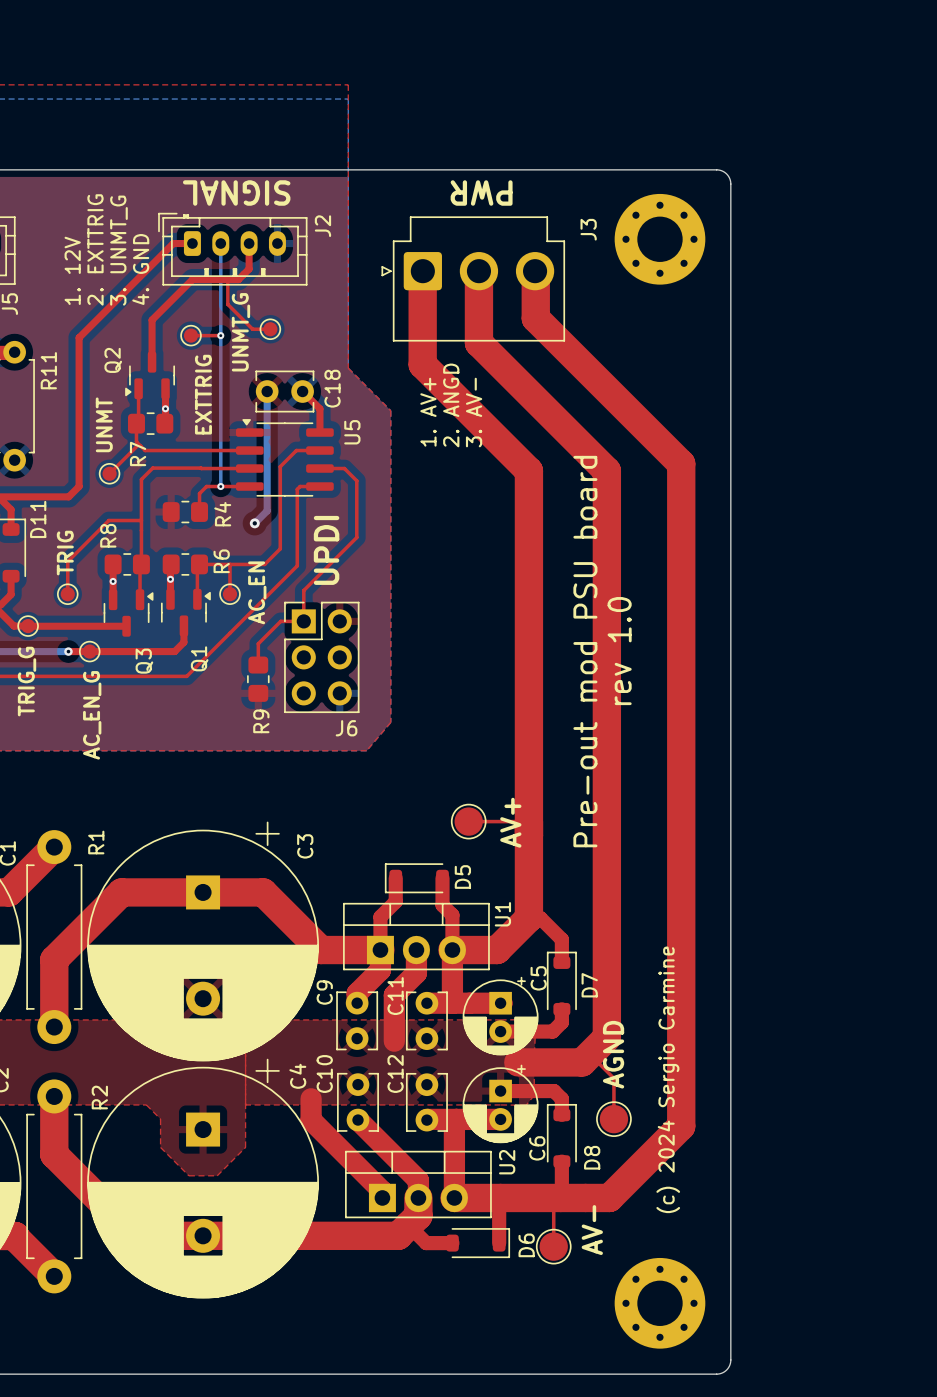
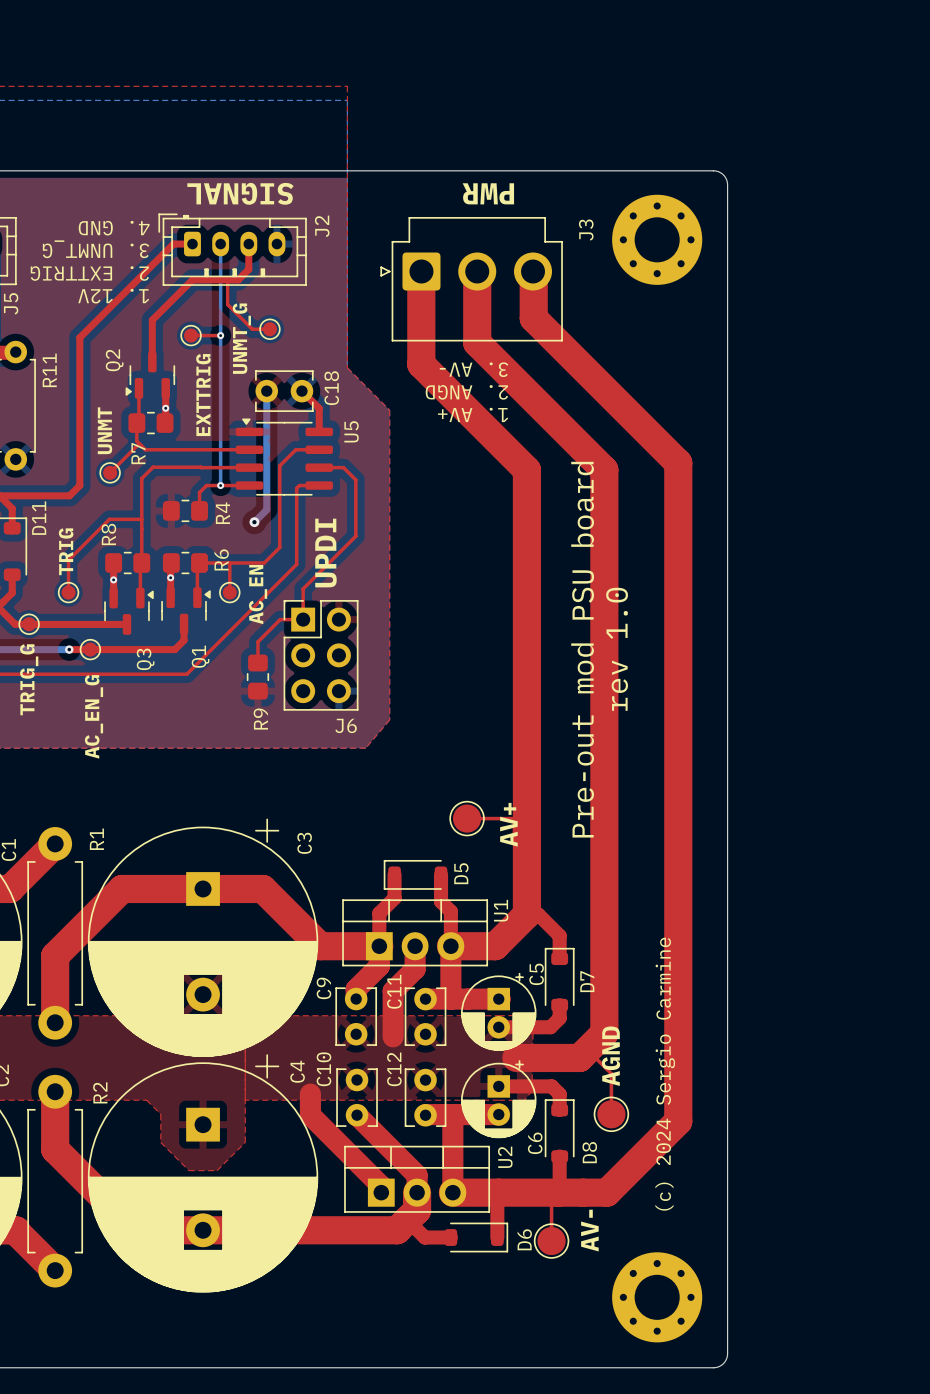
text rotation: 0° (95, 249) -> 90° counterclockwise (89, 273)
text rotation: 0° (118, 250) -> 90° counterclockwise (96, 249)
text rotation: 0° (140, 269) -> 90° counterclockwise (114, 228)
text rotation: 0° (72, 270) -> 90° counterclockwise (113, 296)
text rotation: 0° (451, 405) -> 90° counterclockwise (466, 392)
text rotation: 0° (428, 412) -> 90° counterclockwise (473, 414)
text rotation: 0° (474, 412) -> 90° counterclockwise (474, 369)

